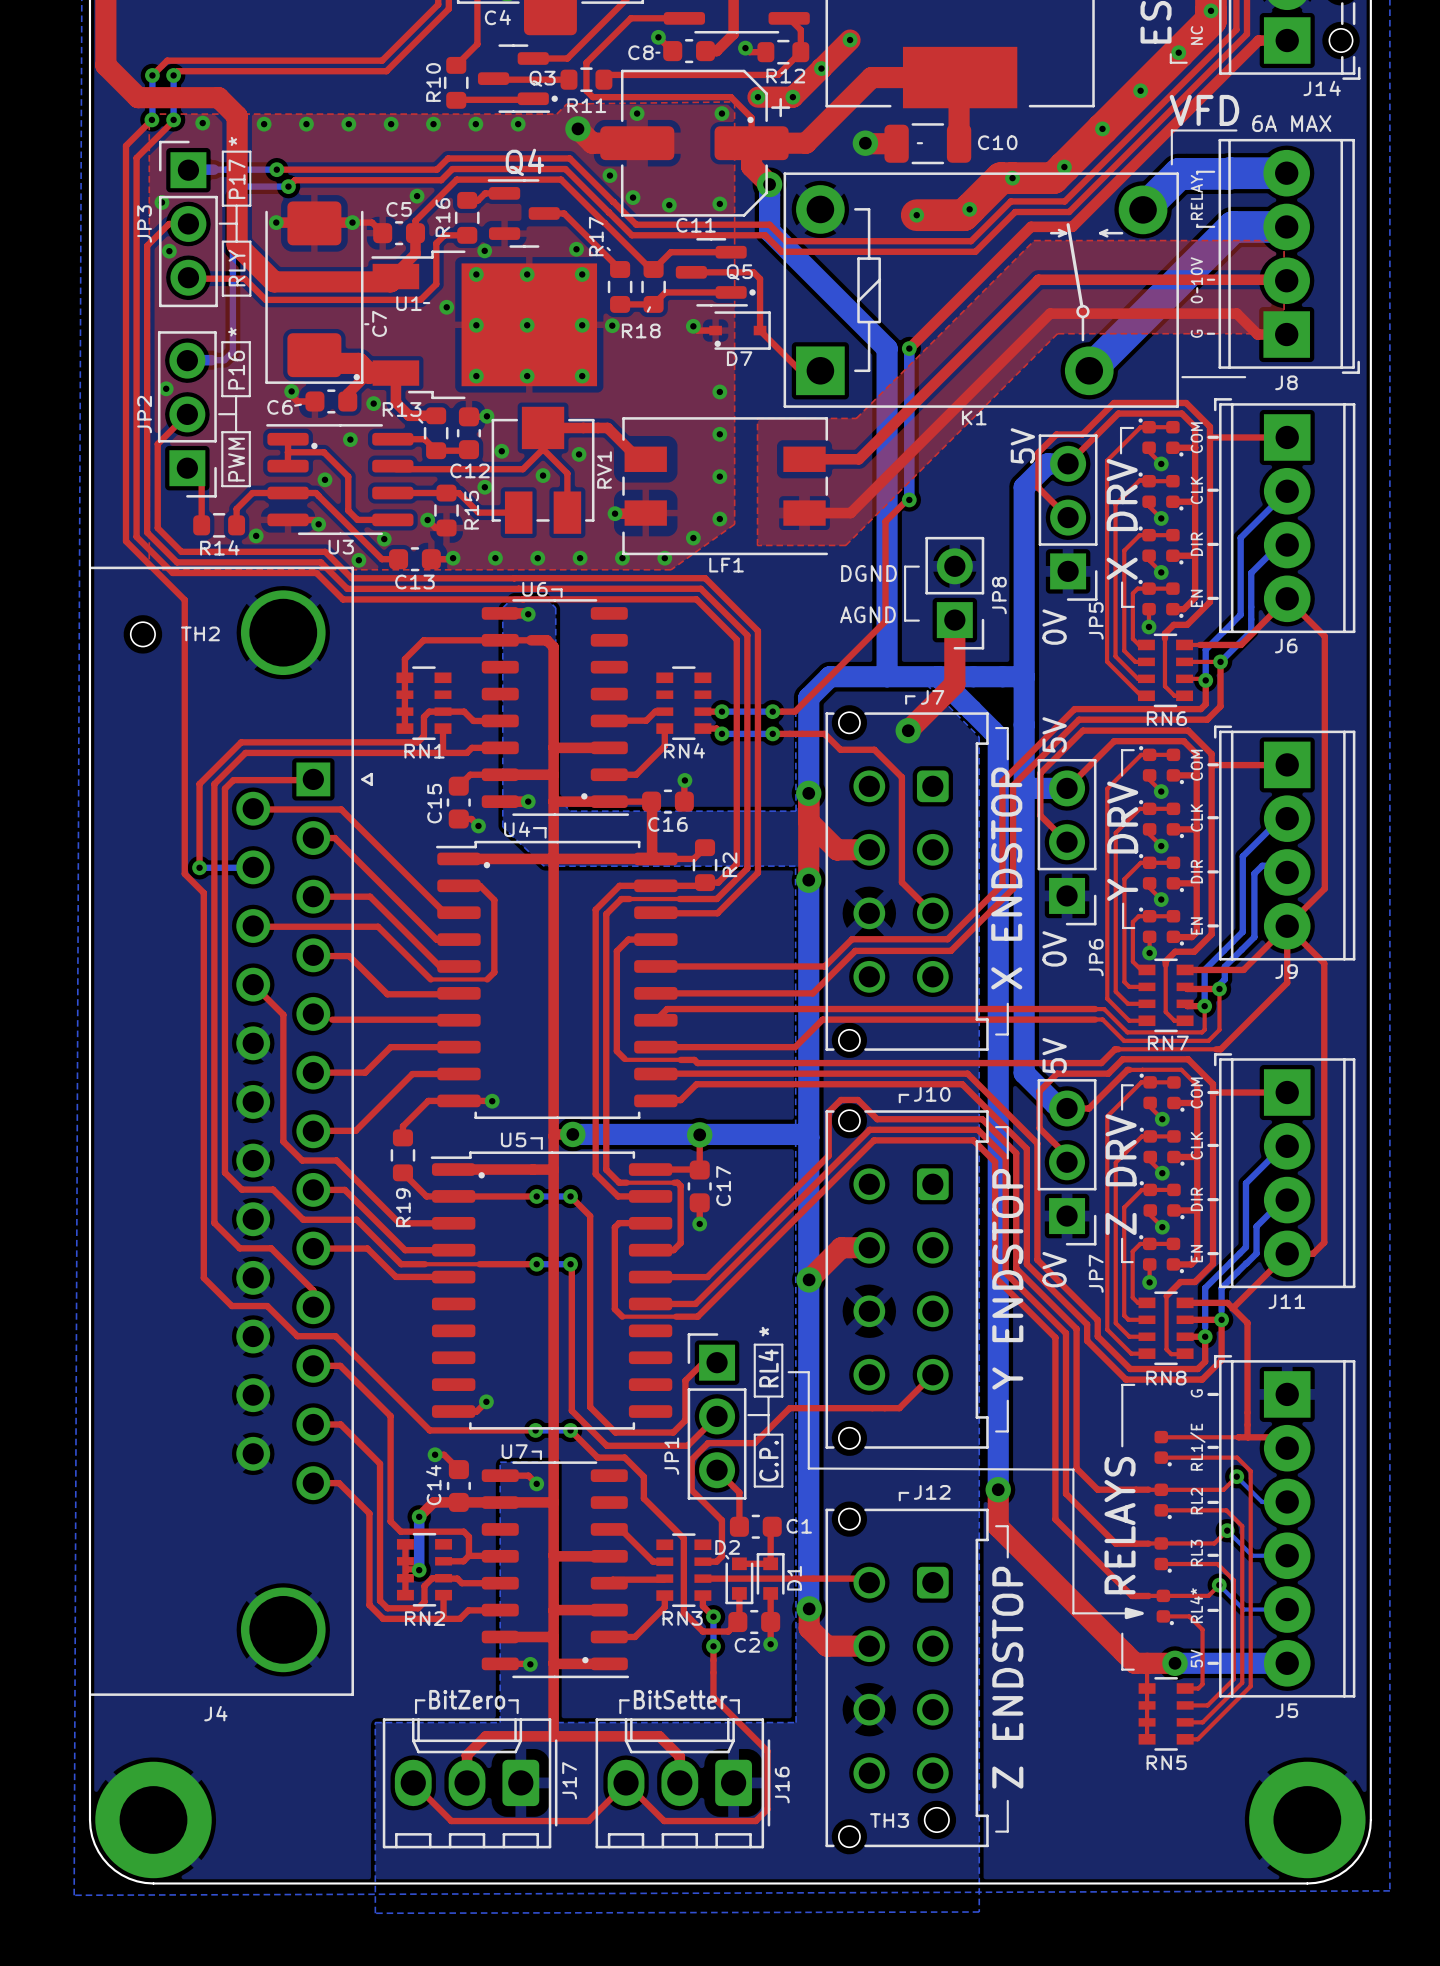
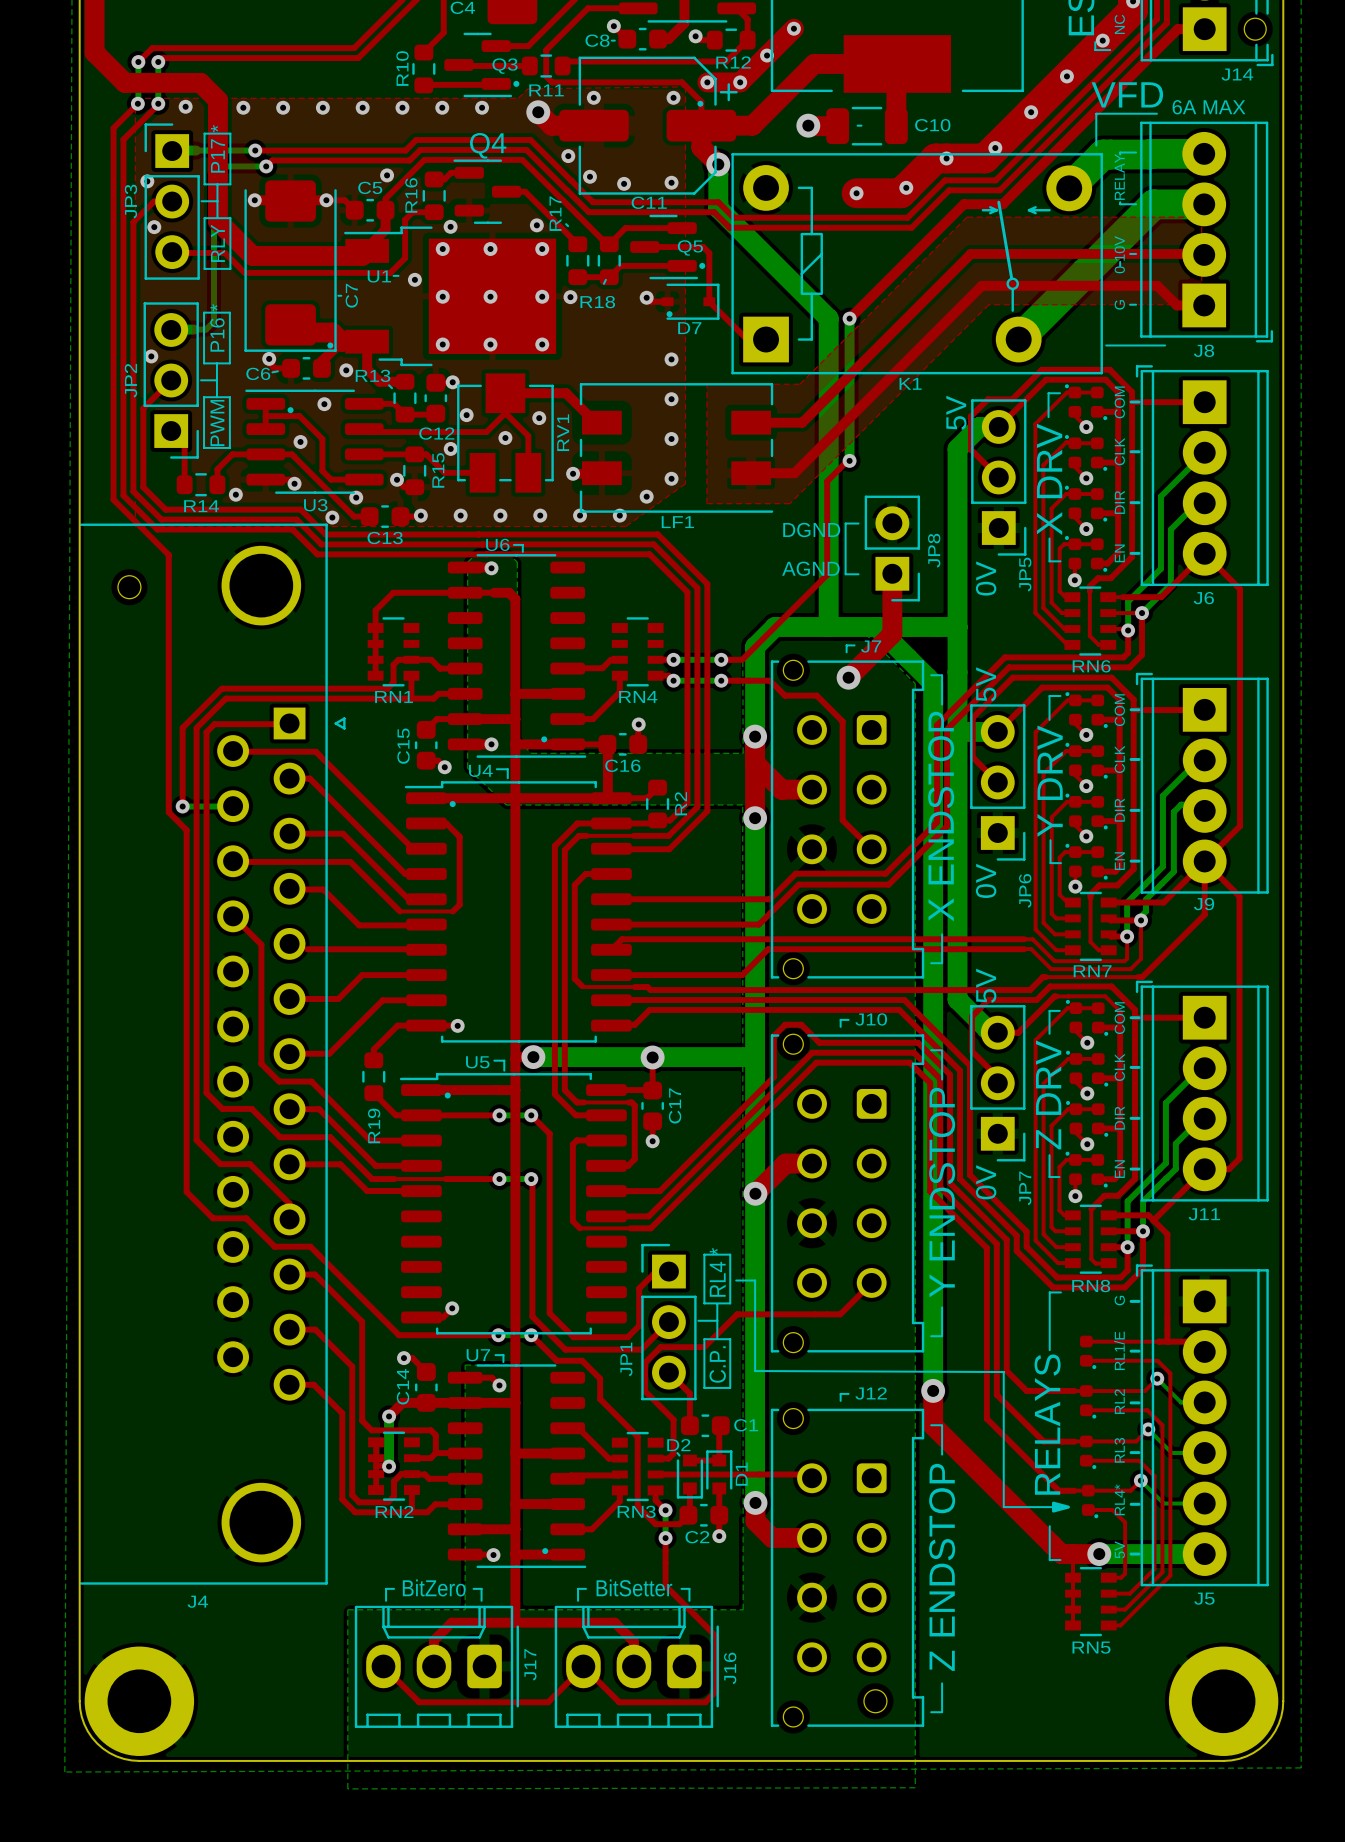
TH2 name: TH2 (200, 633) -> none
TH3 name: TH3 (889, 1820) -> none

